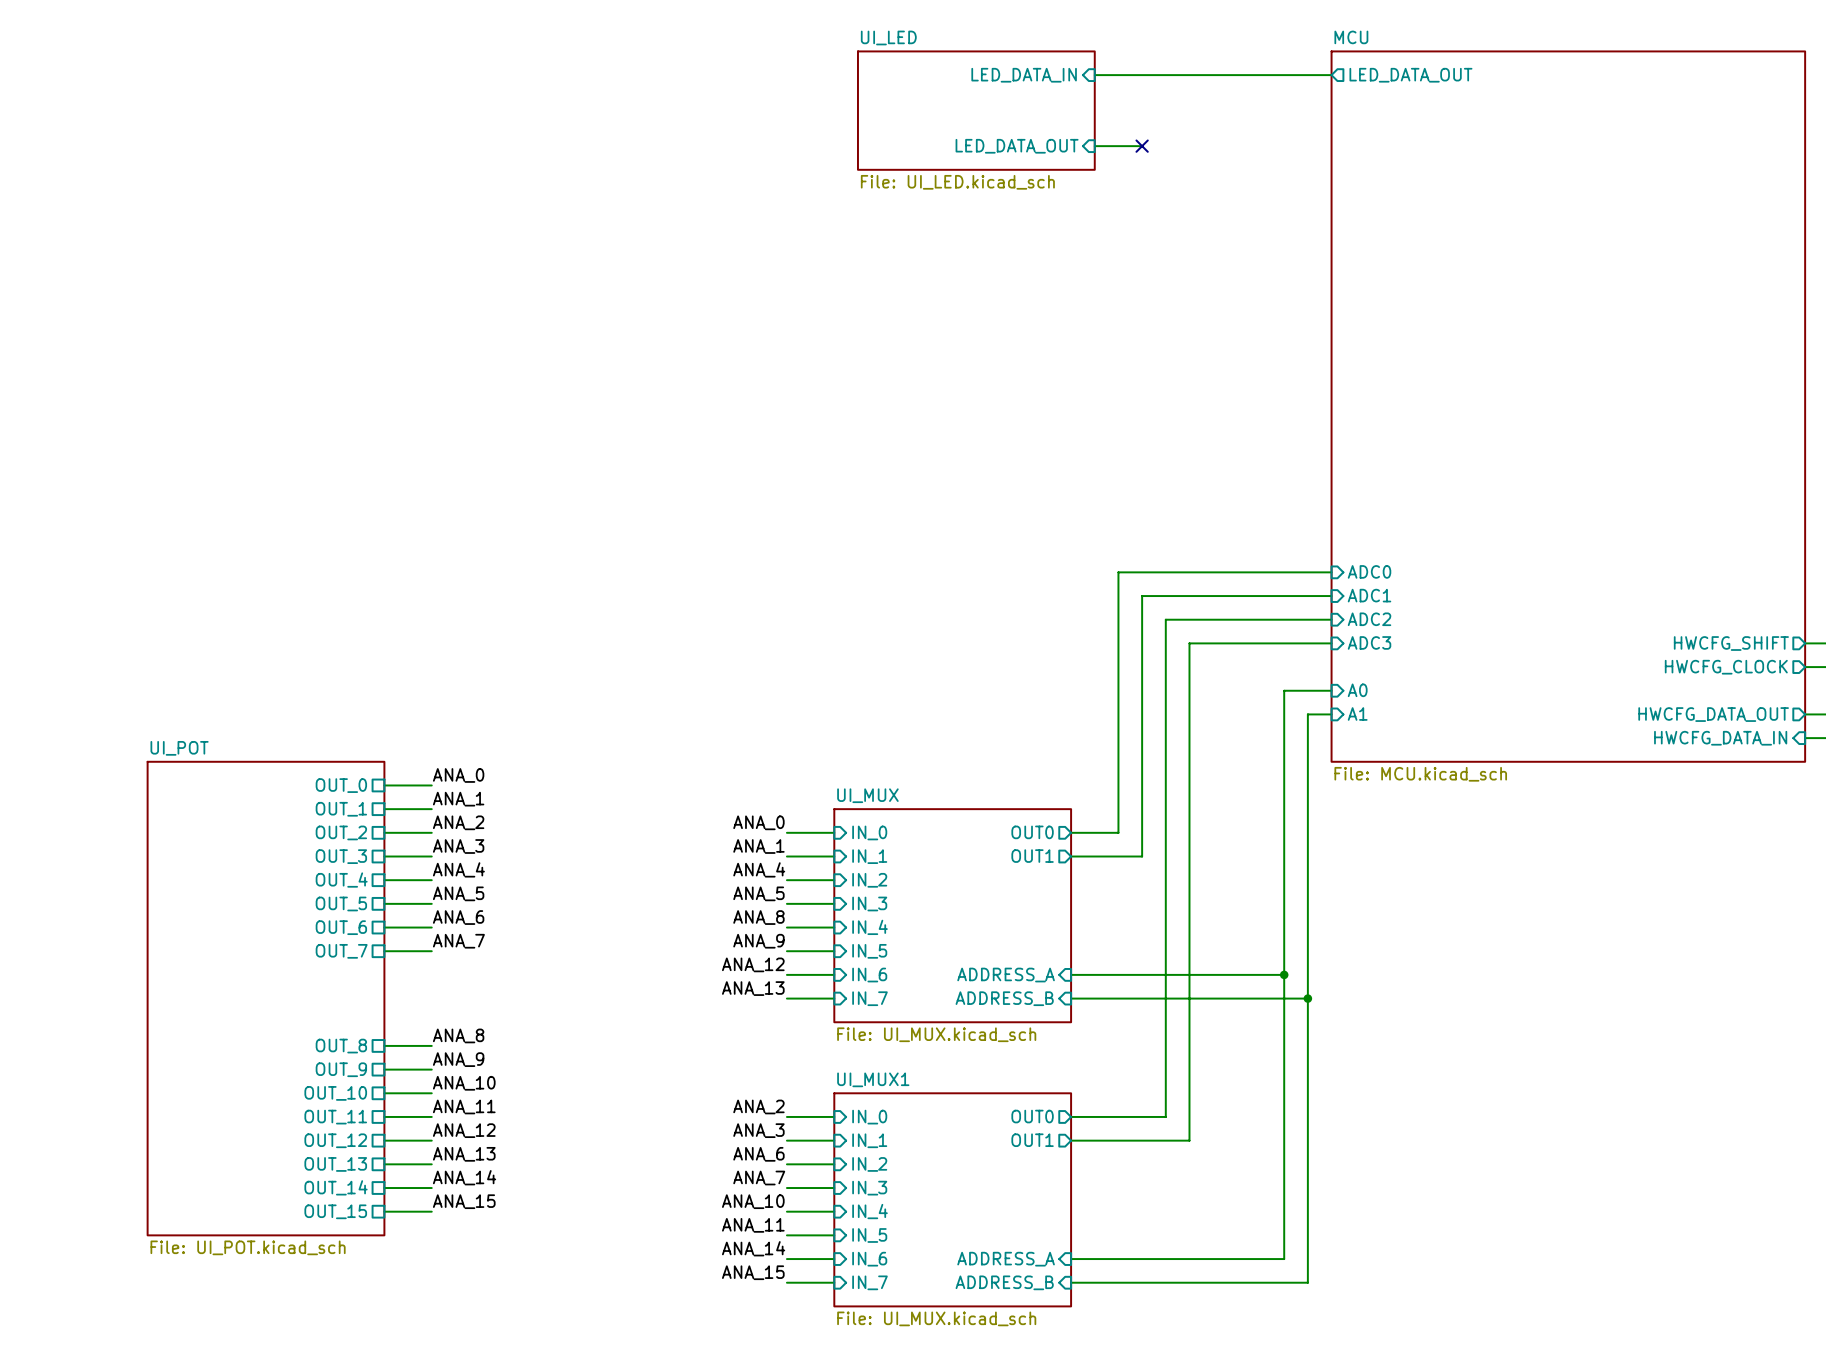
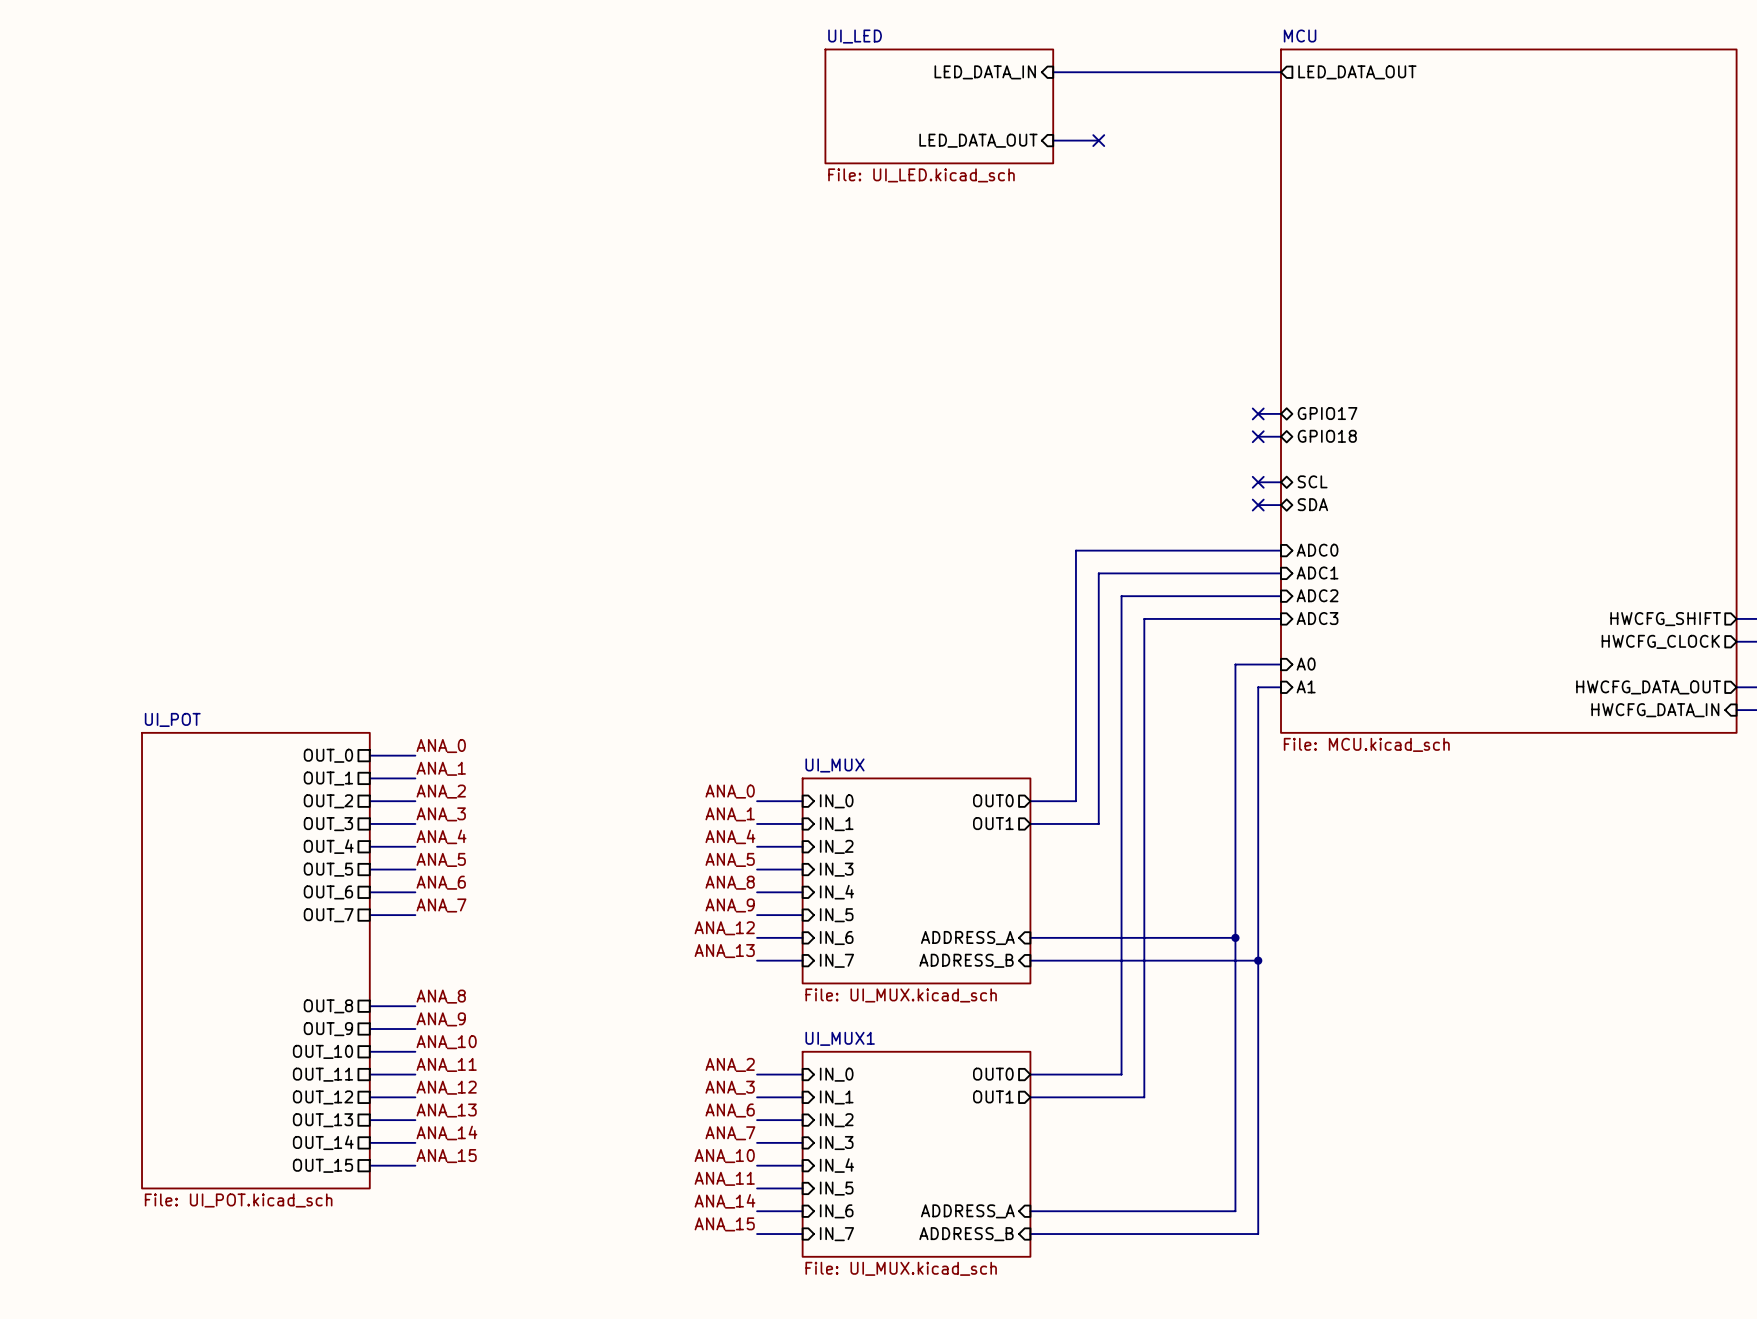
sheet pin: none -> GPIO17 (1327, 413)
wire: none -> (1258, 413) (1281, 413)
no-connect mark: none -> (1258, 413)
wire: none -> (1258, 436) (1281, 436)
no-connect mark: none -> (1258, 436)
sheet pin: none -> GPIO18 (1327, 436)
sheet pin: none -> SCL (1312, 481)
wire: none -> (1258, 482) (1281, 482)
no-connect mark: none -> (1258, 482)
sheet pin: none -> SDA (1312, 504)
wire: none -> (1258, 505) (1281, 505)
no-connect mark: none -> (1258, 505)

